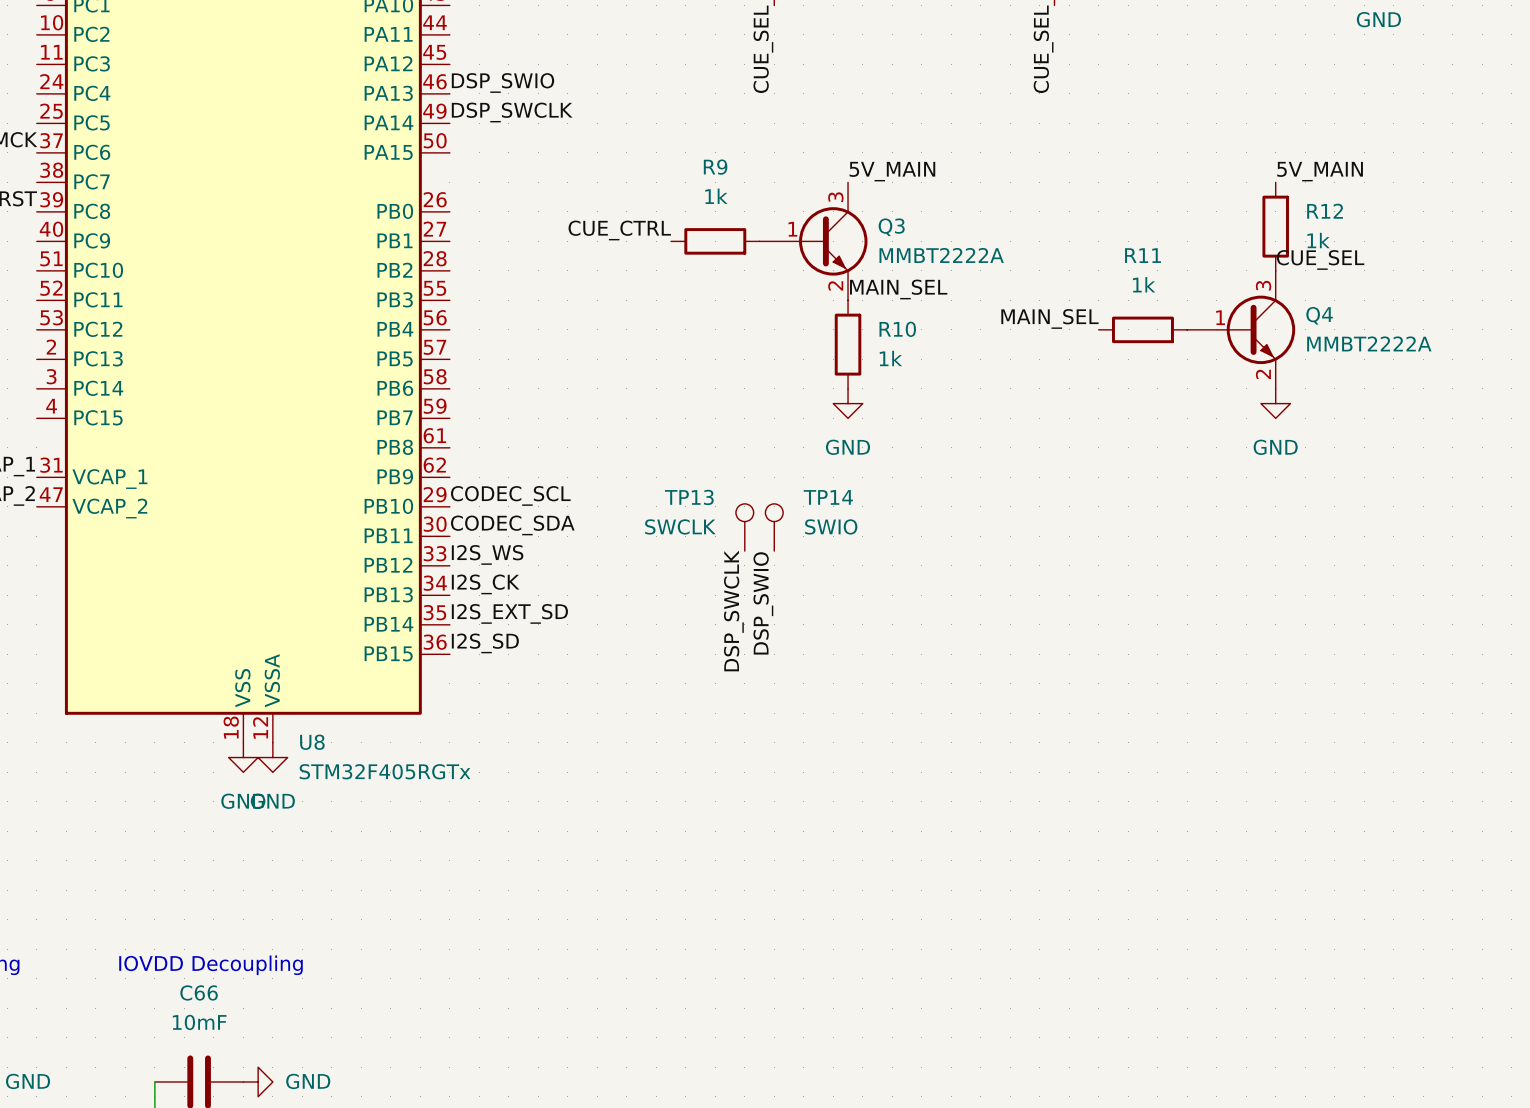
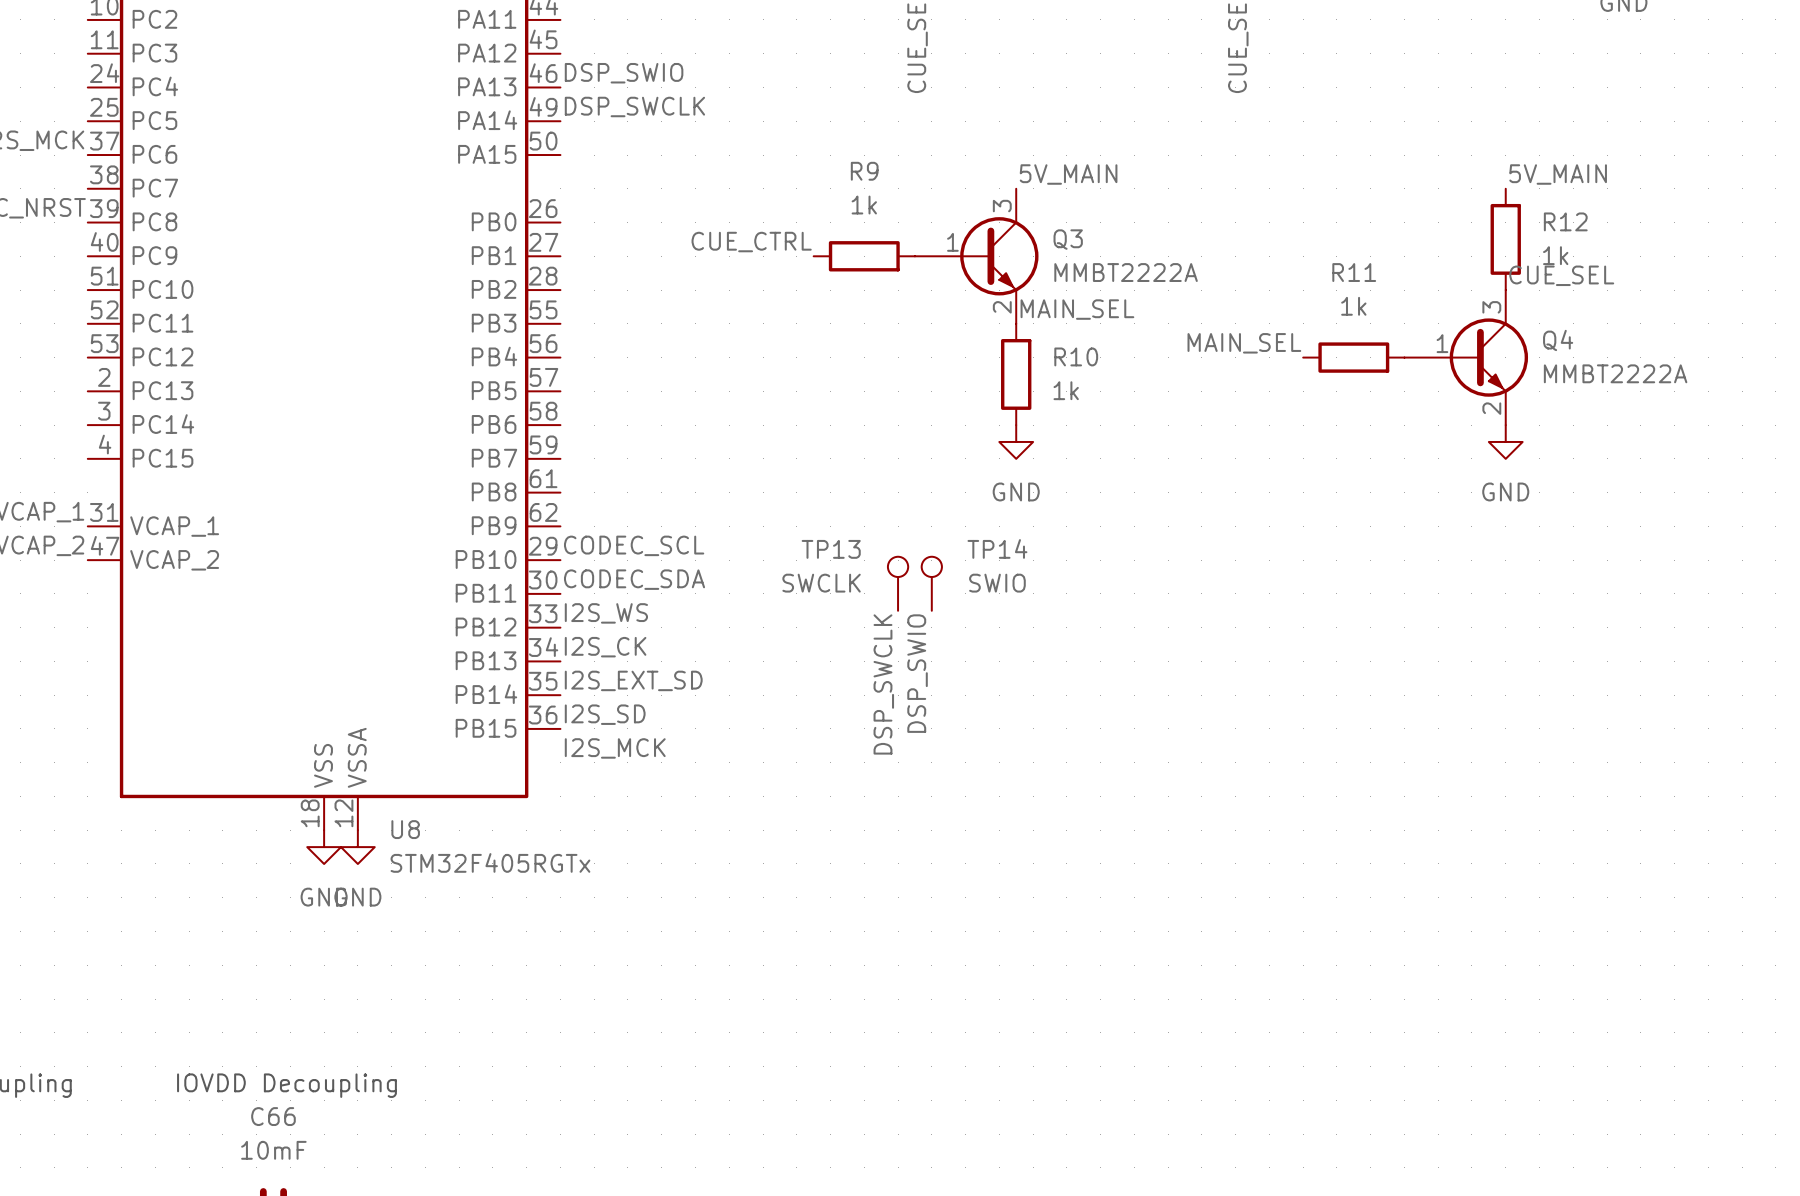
label: none -> I2S_MCK (615, 748)

